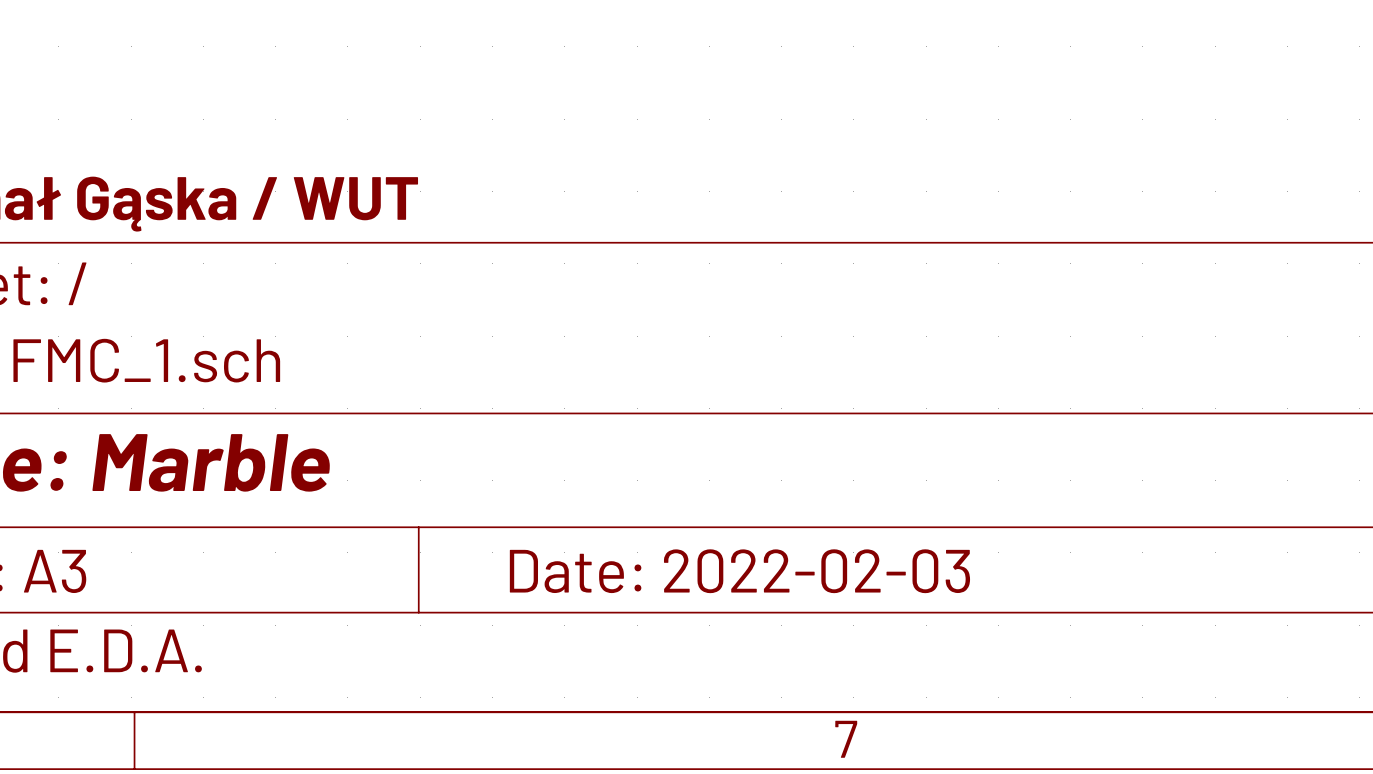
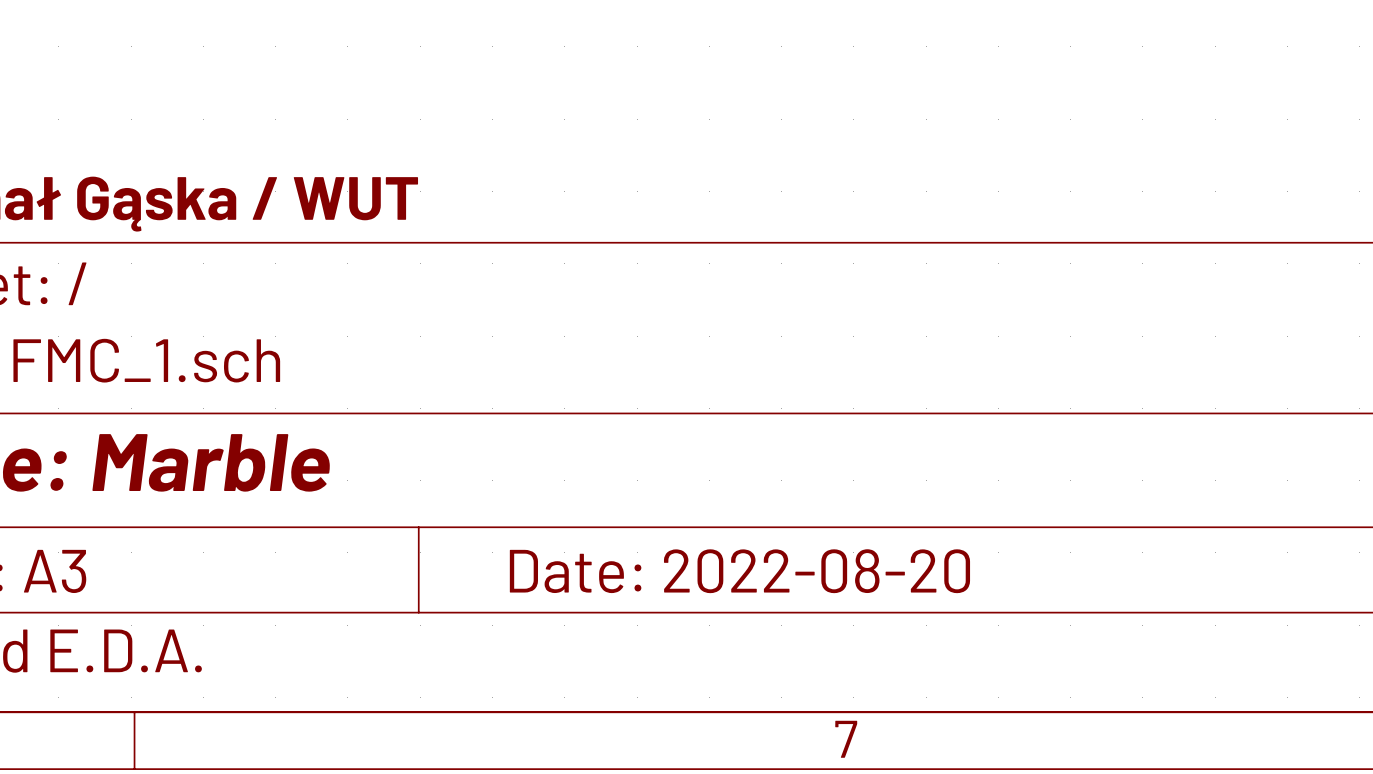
title block: Date: 2022-02-03 (739, 571) -> Date: 2022-08-20 (739, 571)

